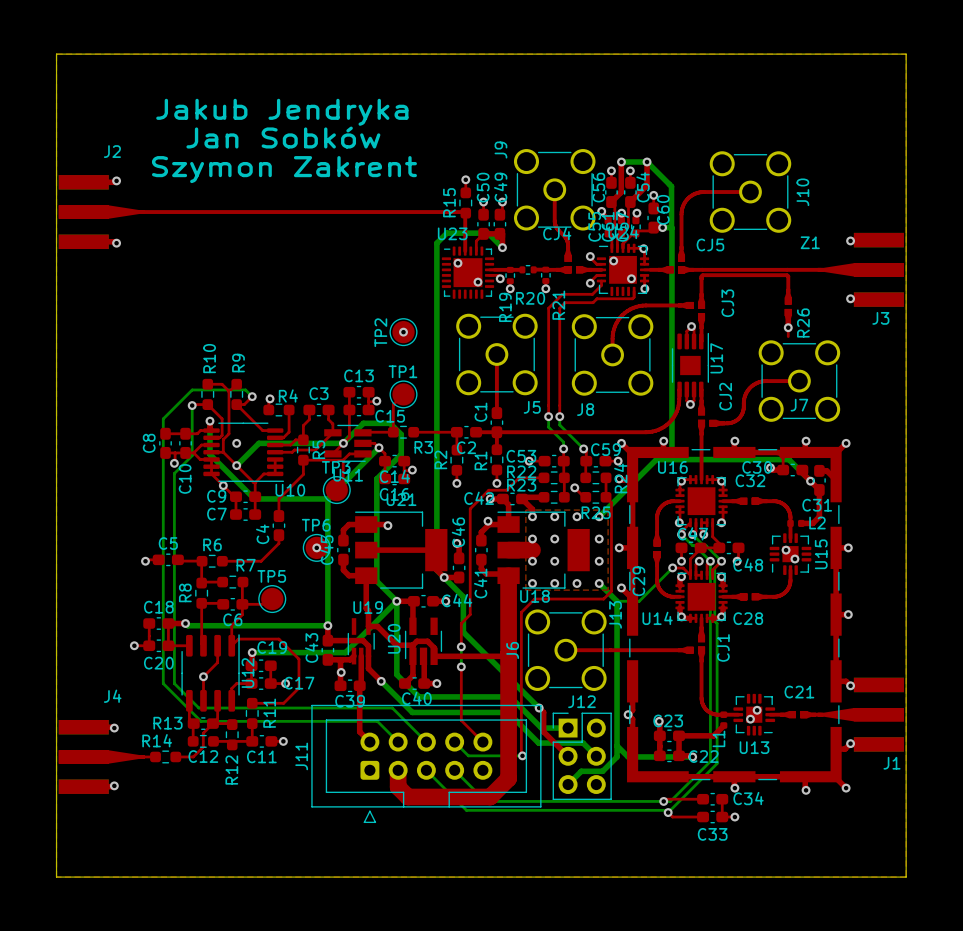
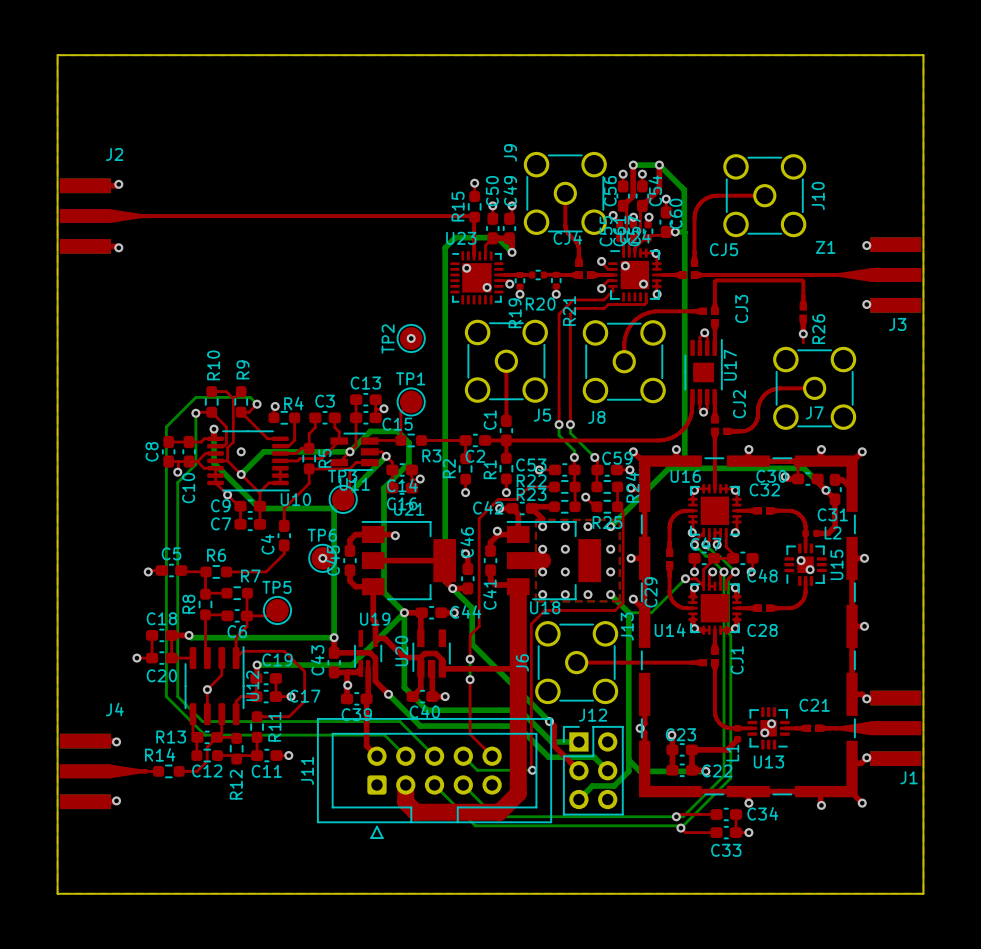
text: Jakub Jendryka (282, 112) -> none
text: Jan Sobków (283, 137) -> none
text: Szymon Zakrent (284, 169) -> none

